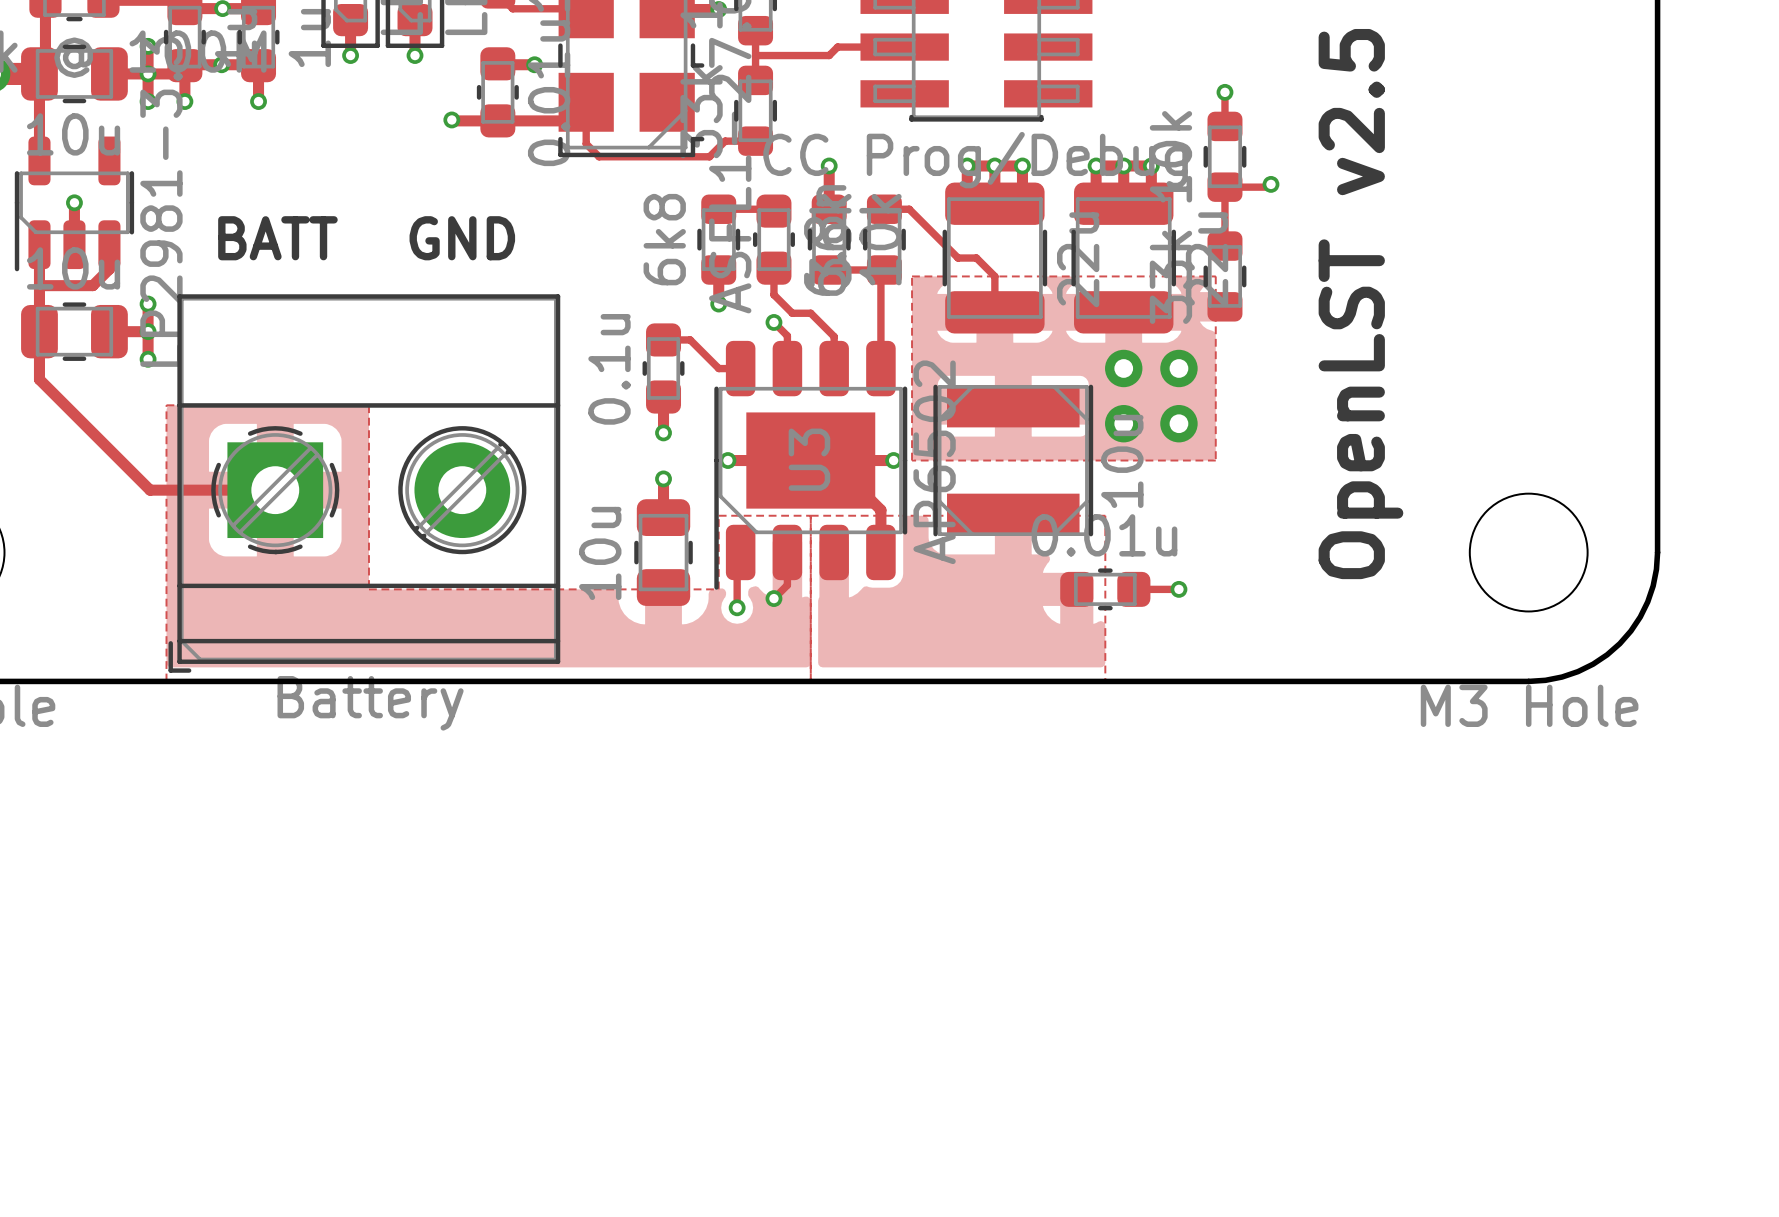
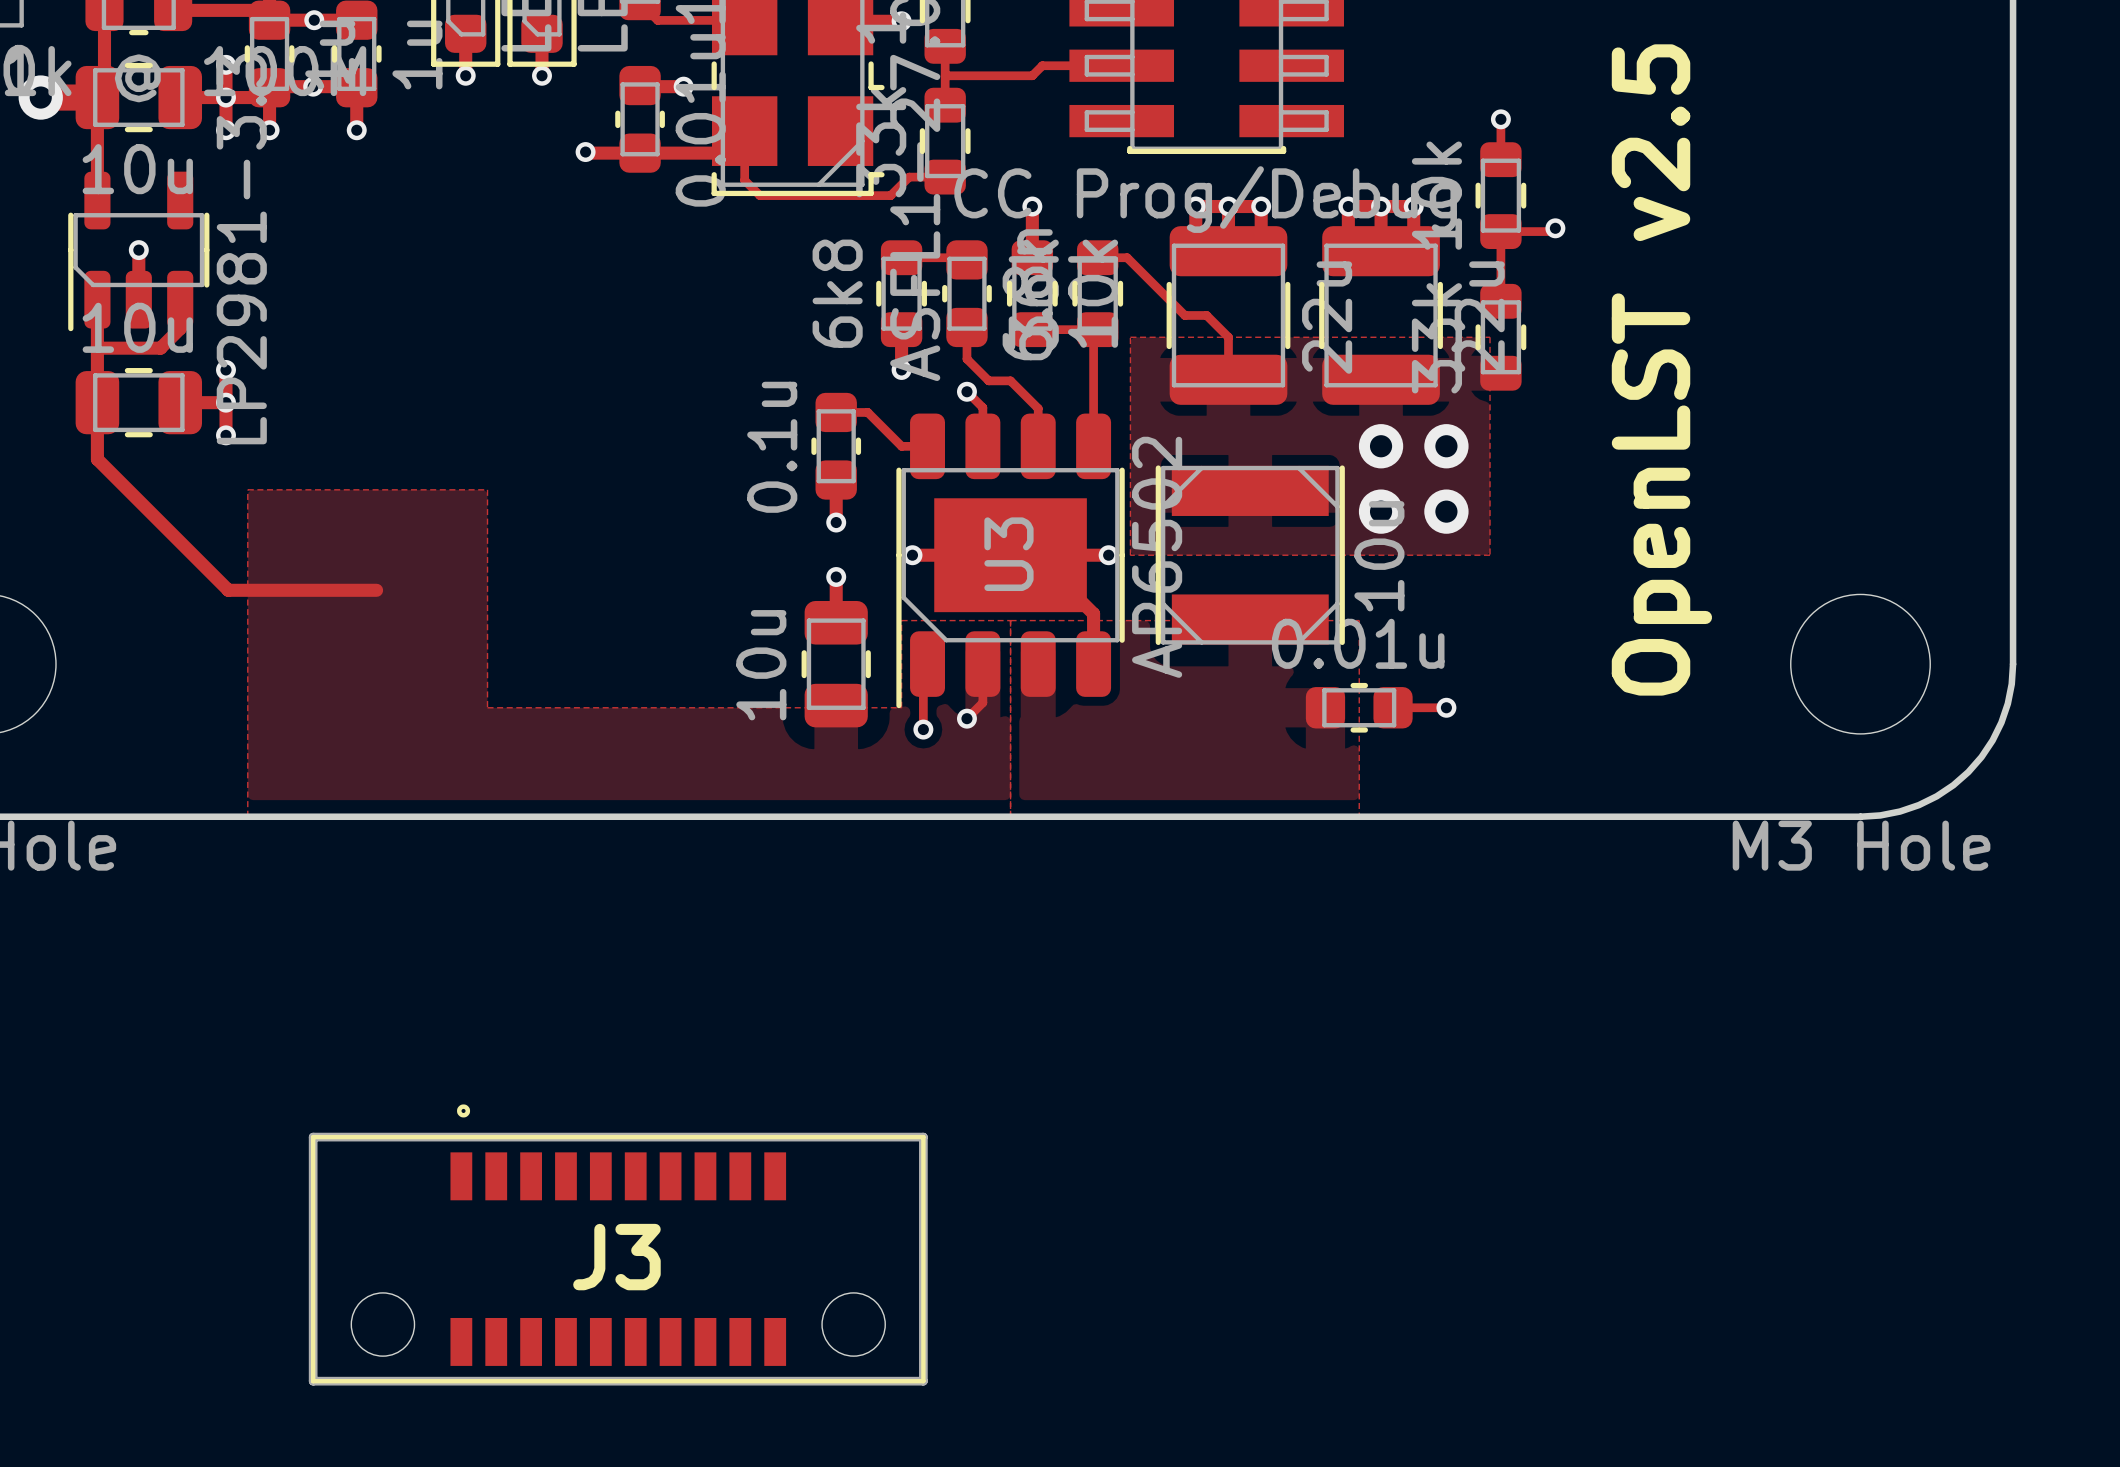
text: BATT (277, 238) -> none
text: GND (462, 238) -> none
part: Battery (364, 483) -> none
J3: none -> (618, 1244)

